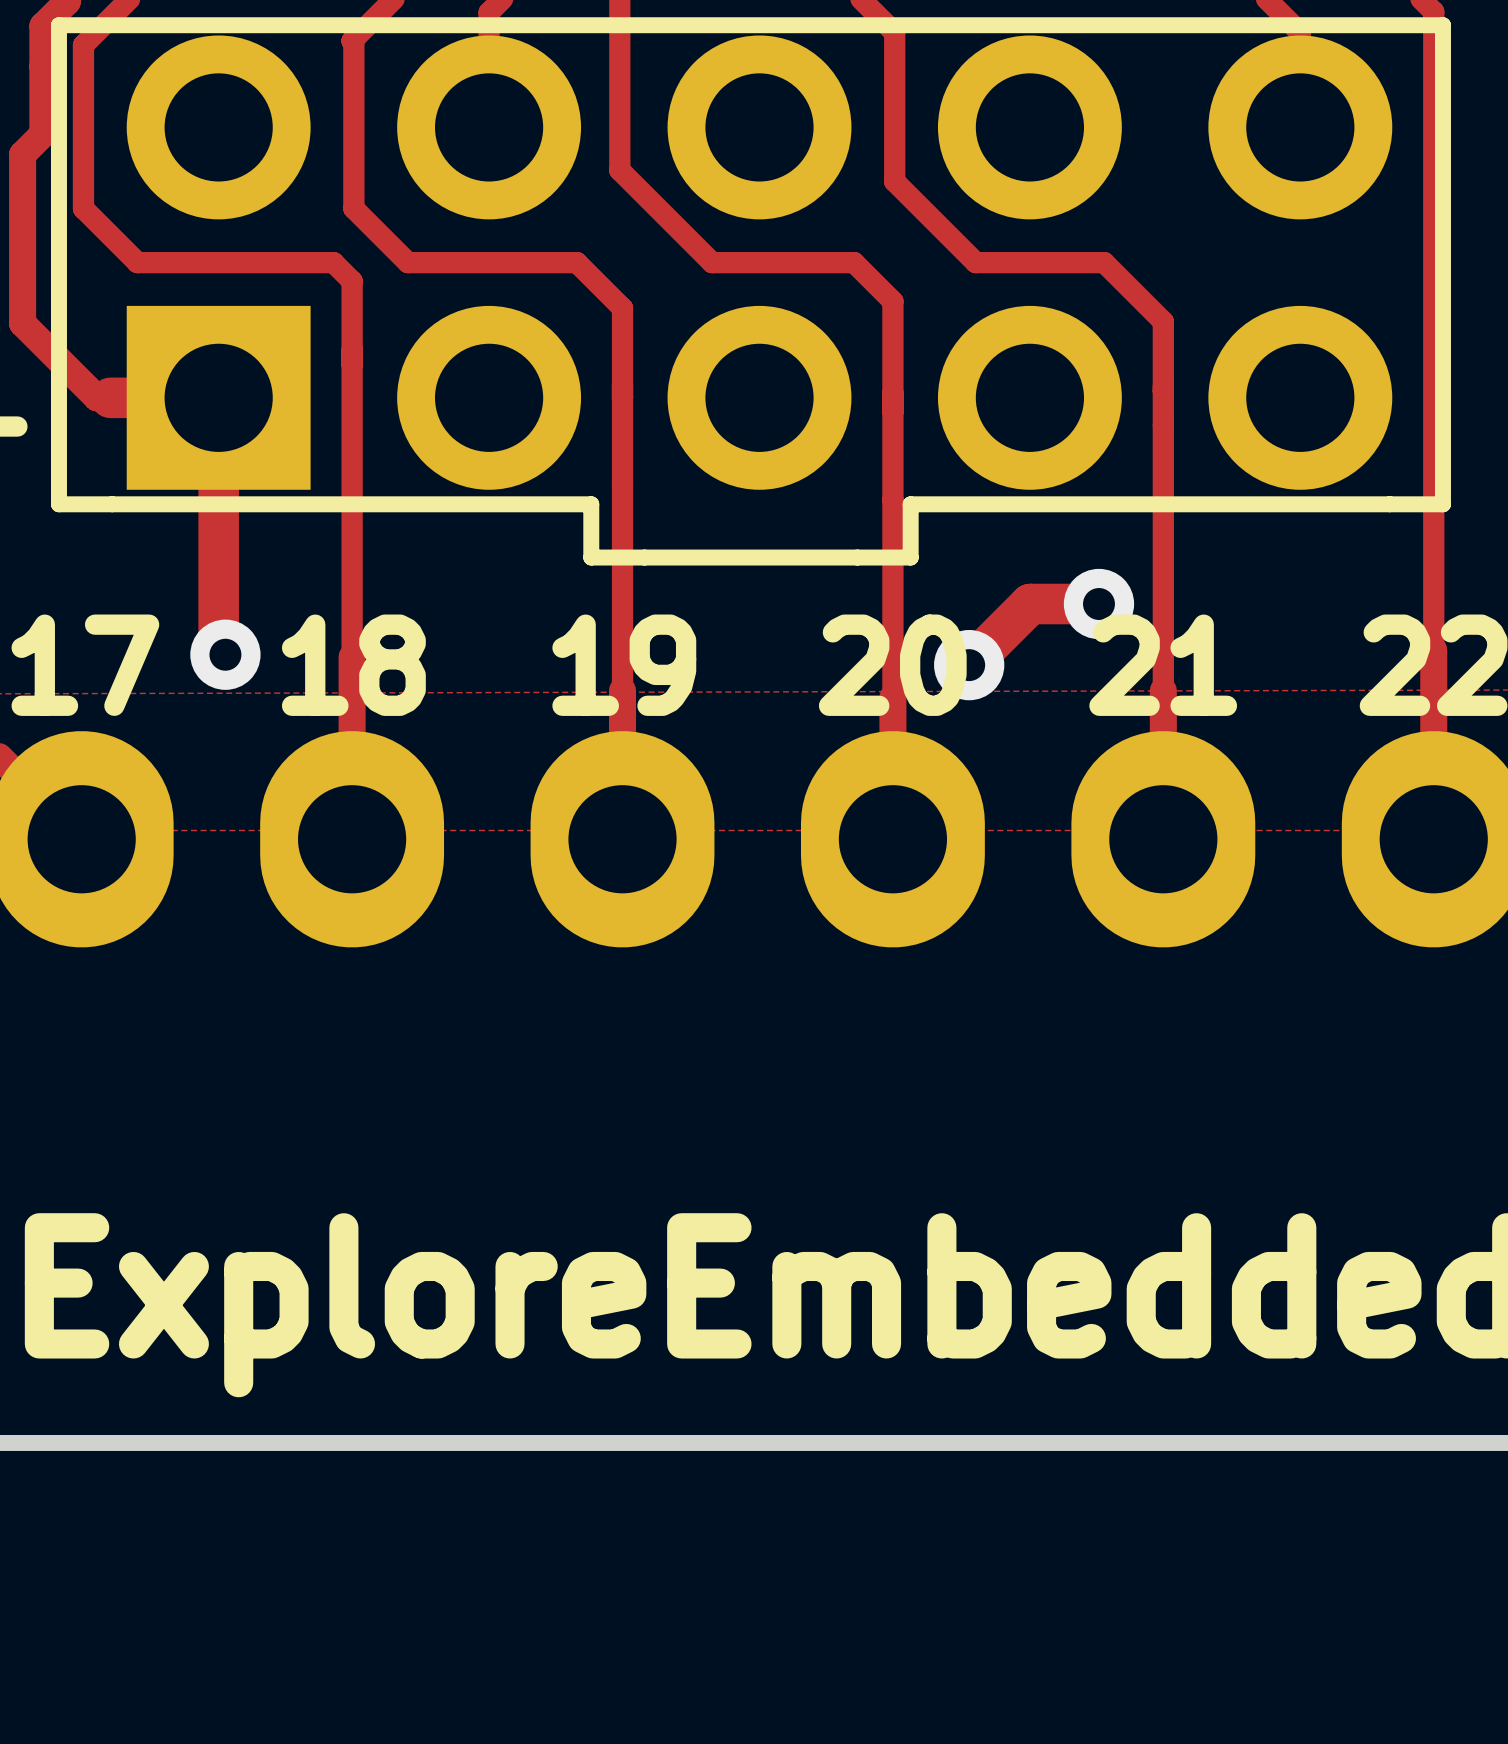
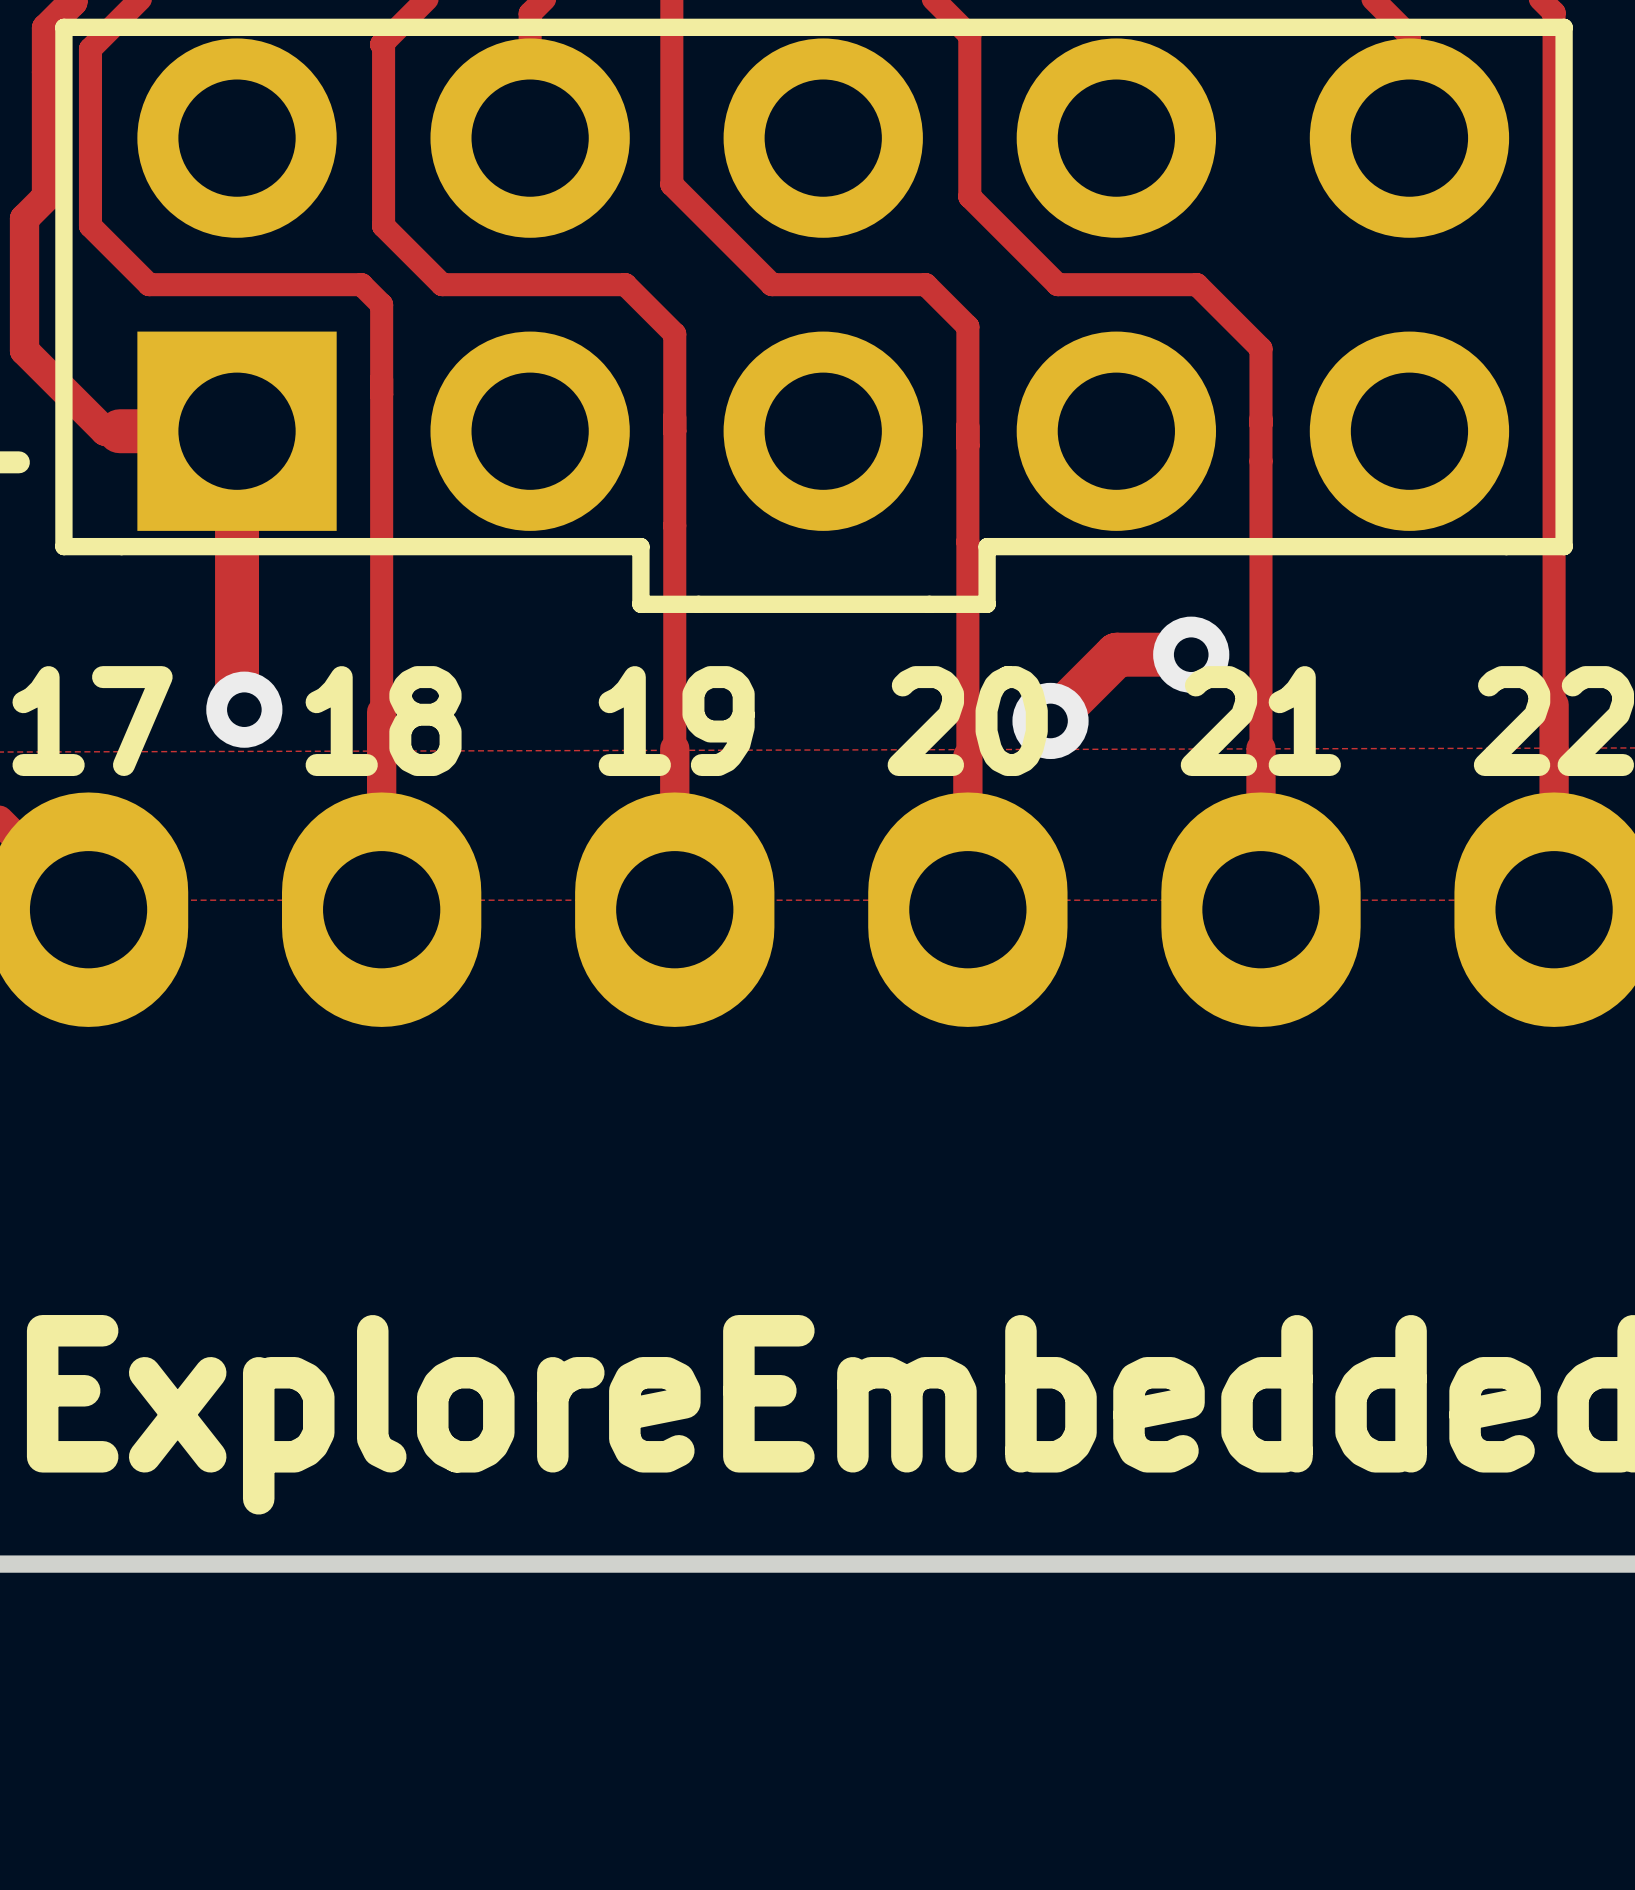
track: (42, 134) (22, 154) (22, 201) -> (46, 145) (46, 196) (24, 218)

